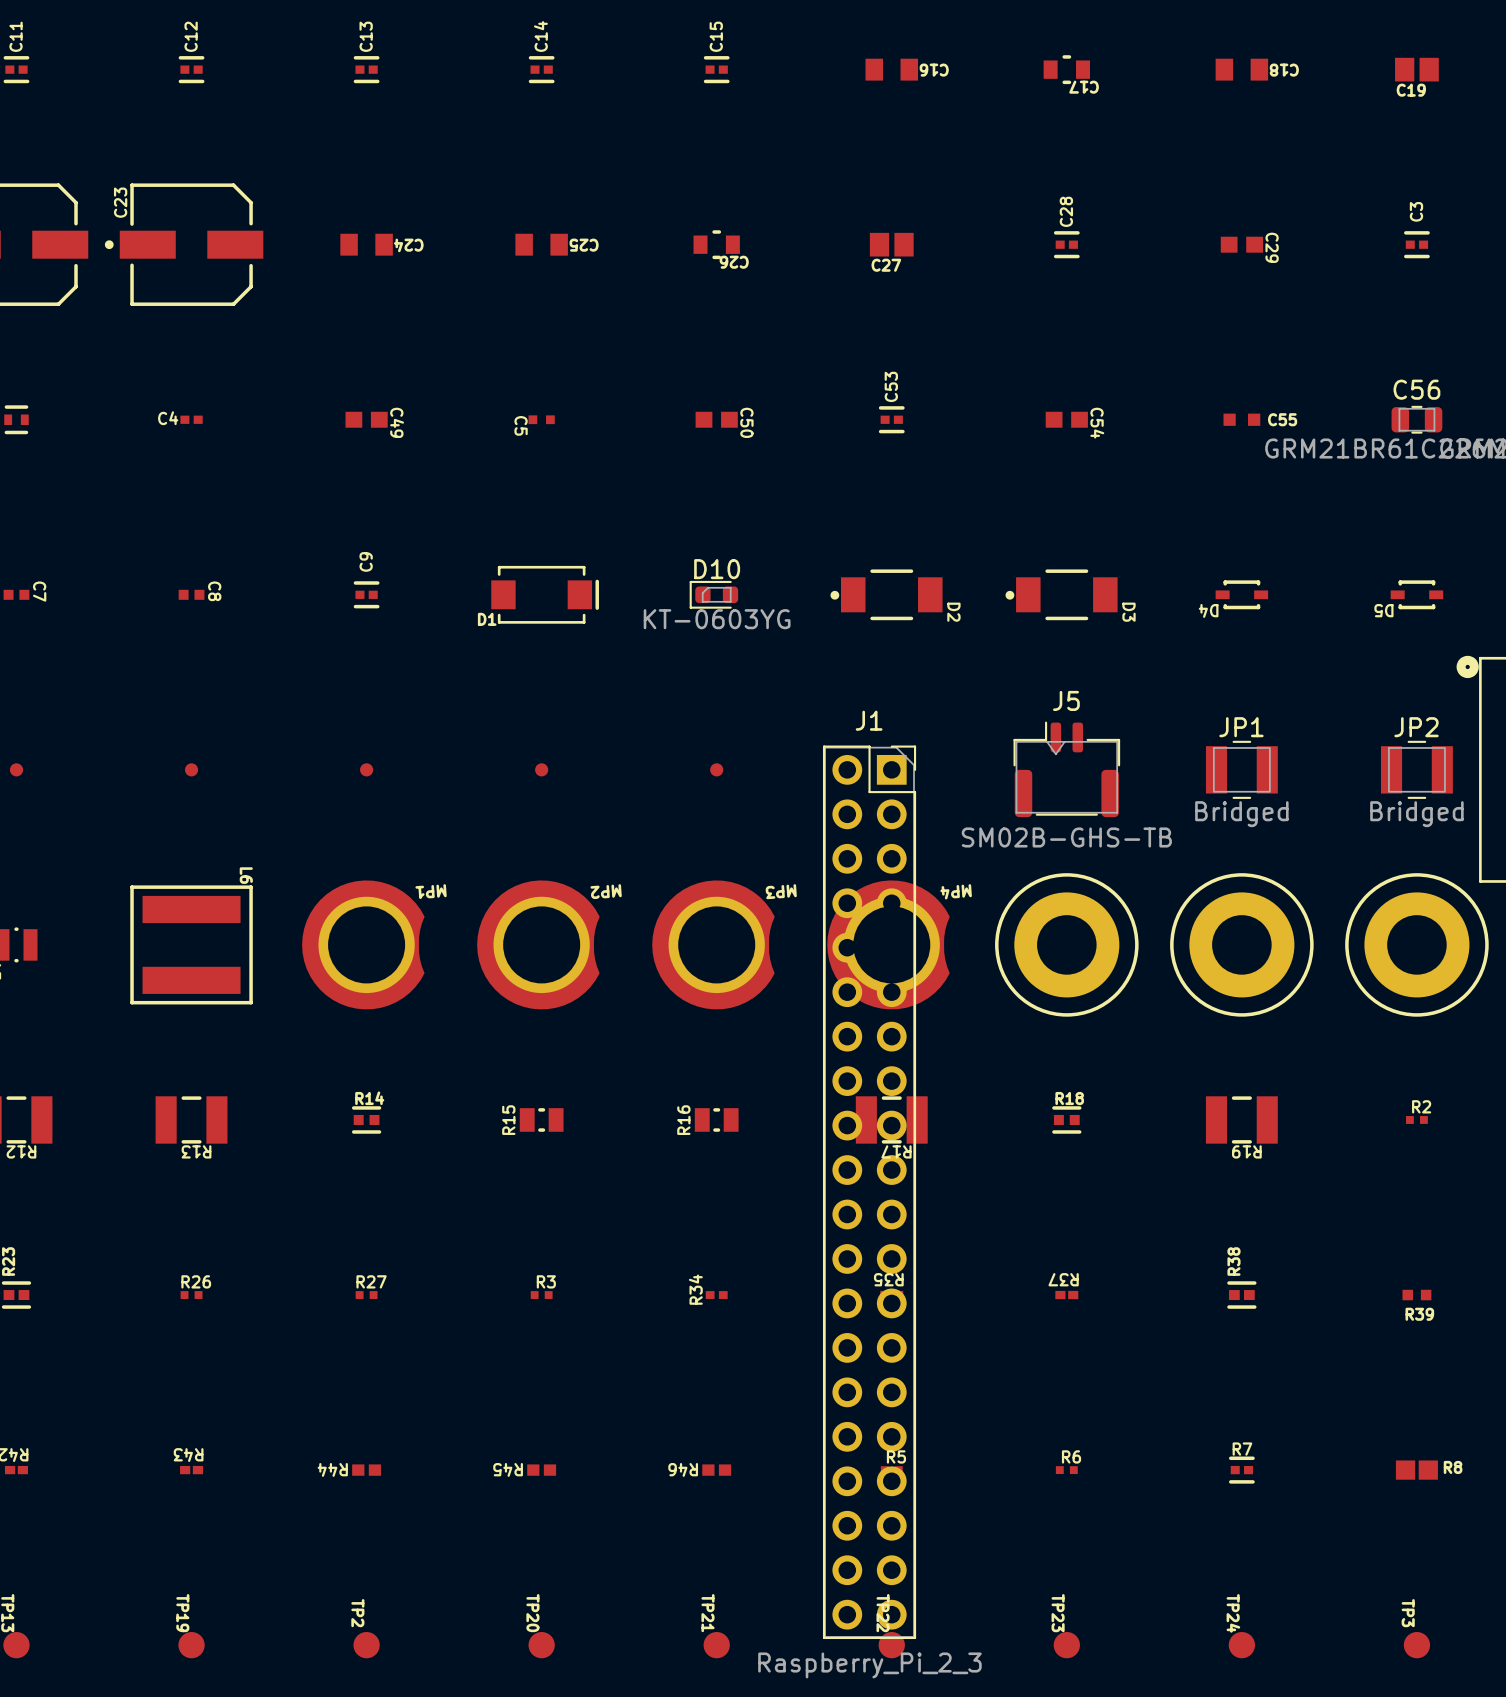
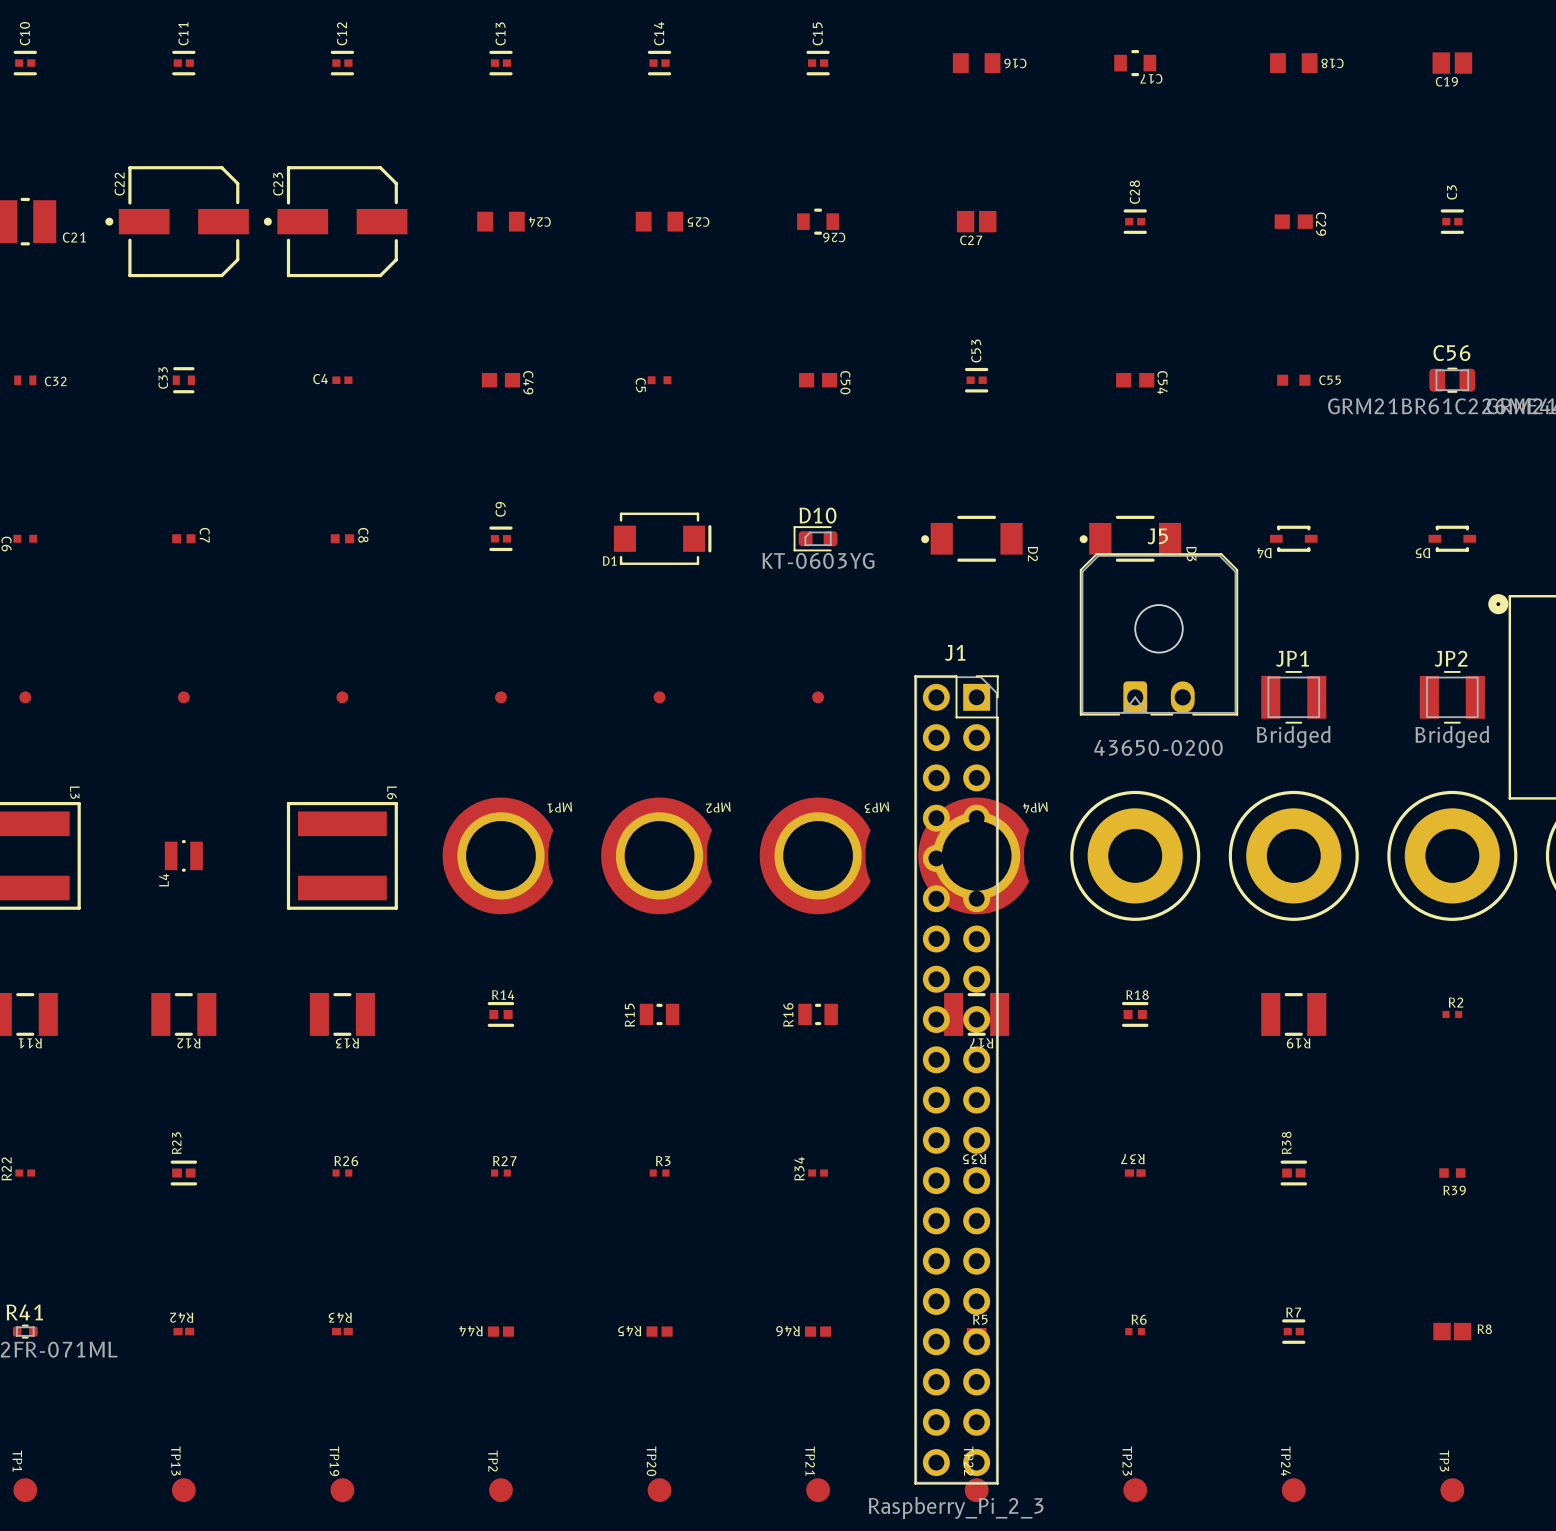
J5 name position: J5 (1066, 700) -> J5 (1157, 536)
J5 footprint: [1013, 721, 1121, 818] -> [1079, 553, 1239, 716]
J5 value: SM02B-GHS-TB (1066, 837) -> 43650-0200 (1158, 747)

